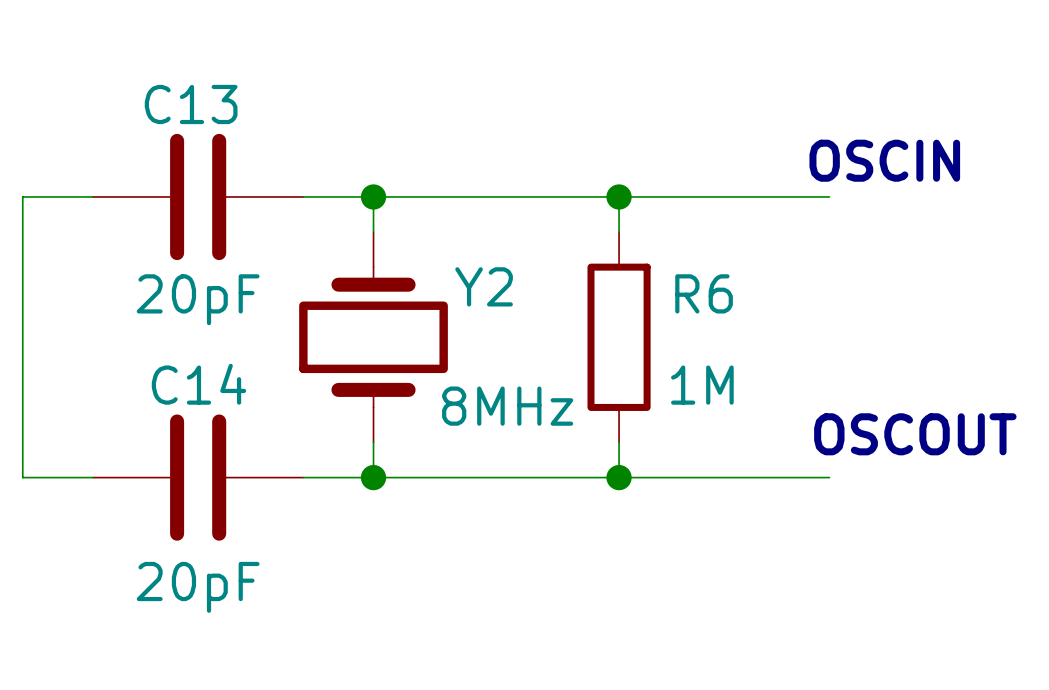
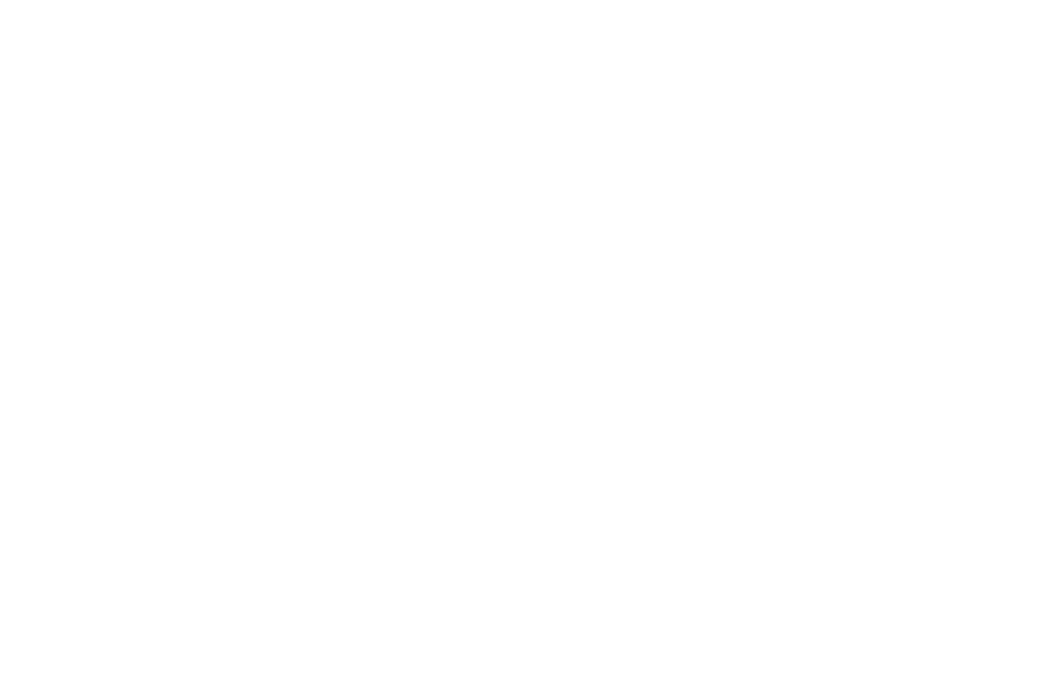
text: OSCIN (884, 160) -> none
wire: (92, 196) (22, 196) (22, 477) (92, 477) -> none
C13: 20pF (198, 196) -> none
wire: (303, 196) (829, 196) -> none
wire: (373, 196) (373, 232) -> none
junction: (373, 196) -> none
wire: (619, 196) (619, 232) -> none
junction: (619, 196) -> none
8MHz: Y2 (373, 337) -> none
R6: 1M (619, 337) -> none
text: OSCOUT (915, 434) -> none
wire: (373, 442) (373, 477) -> none
wire: (619, 442) (619, 477) -> none
C14: 20pF (198, 477) -> none
wire: (303, 477) (829, 477) -> none
junction: (373, 477) -> none
junction: (619, 477) -> none

